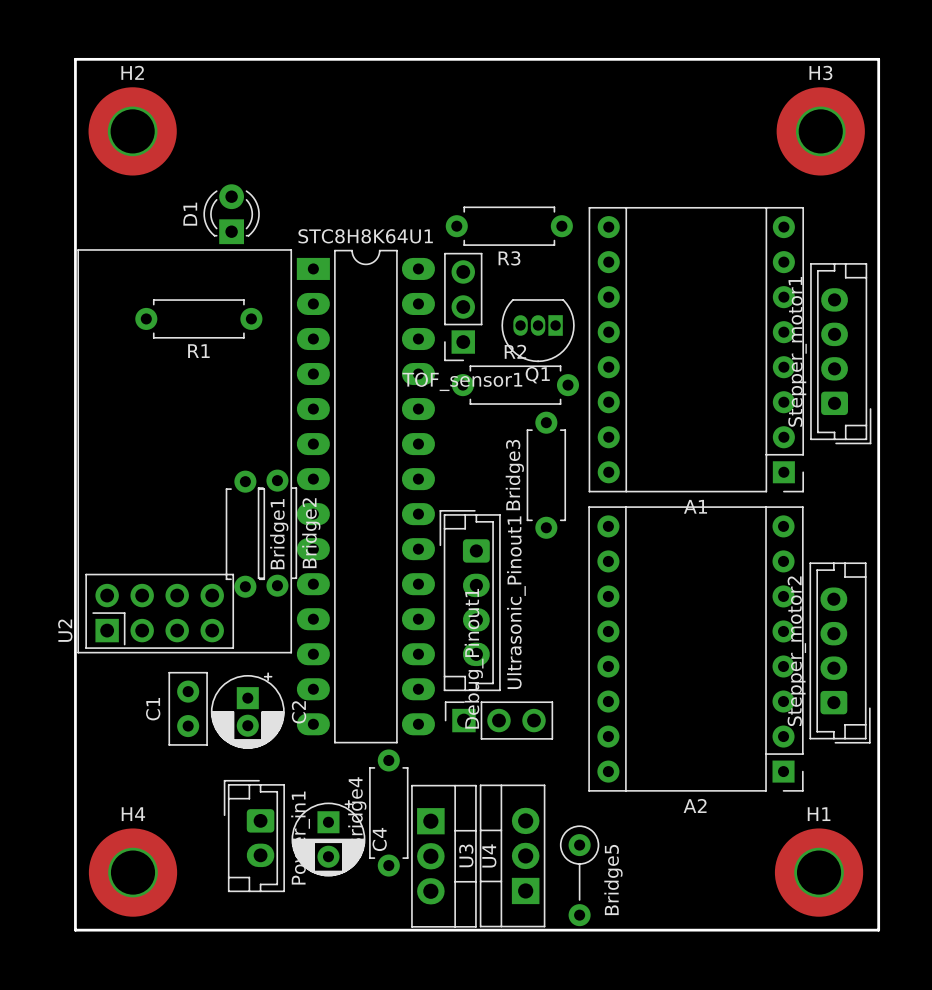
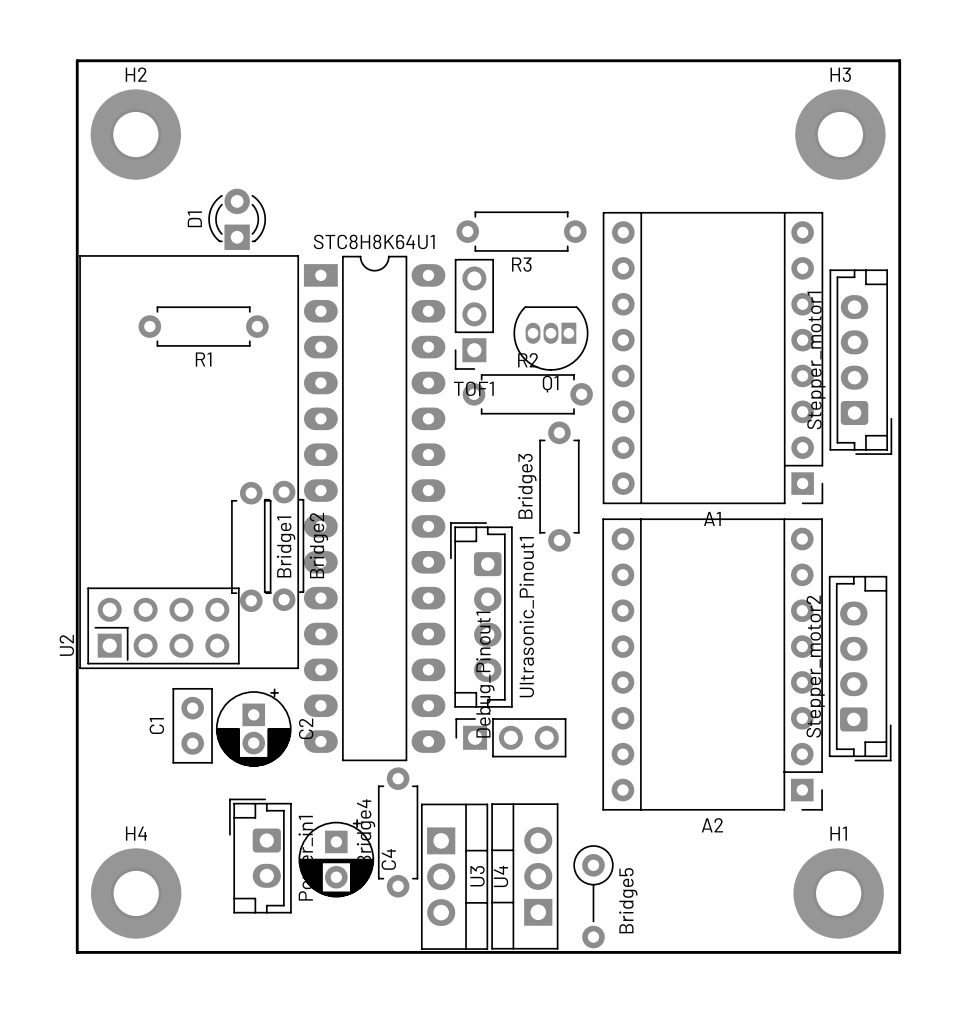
TOF_sensor1 name: TOF_sensor1 (462, 381) -> TOF1 (473, 388)

